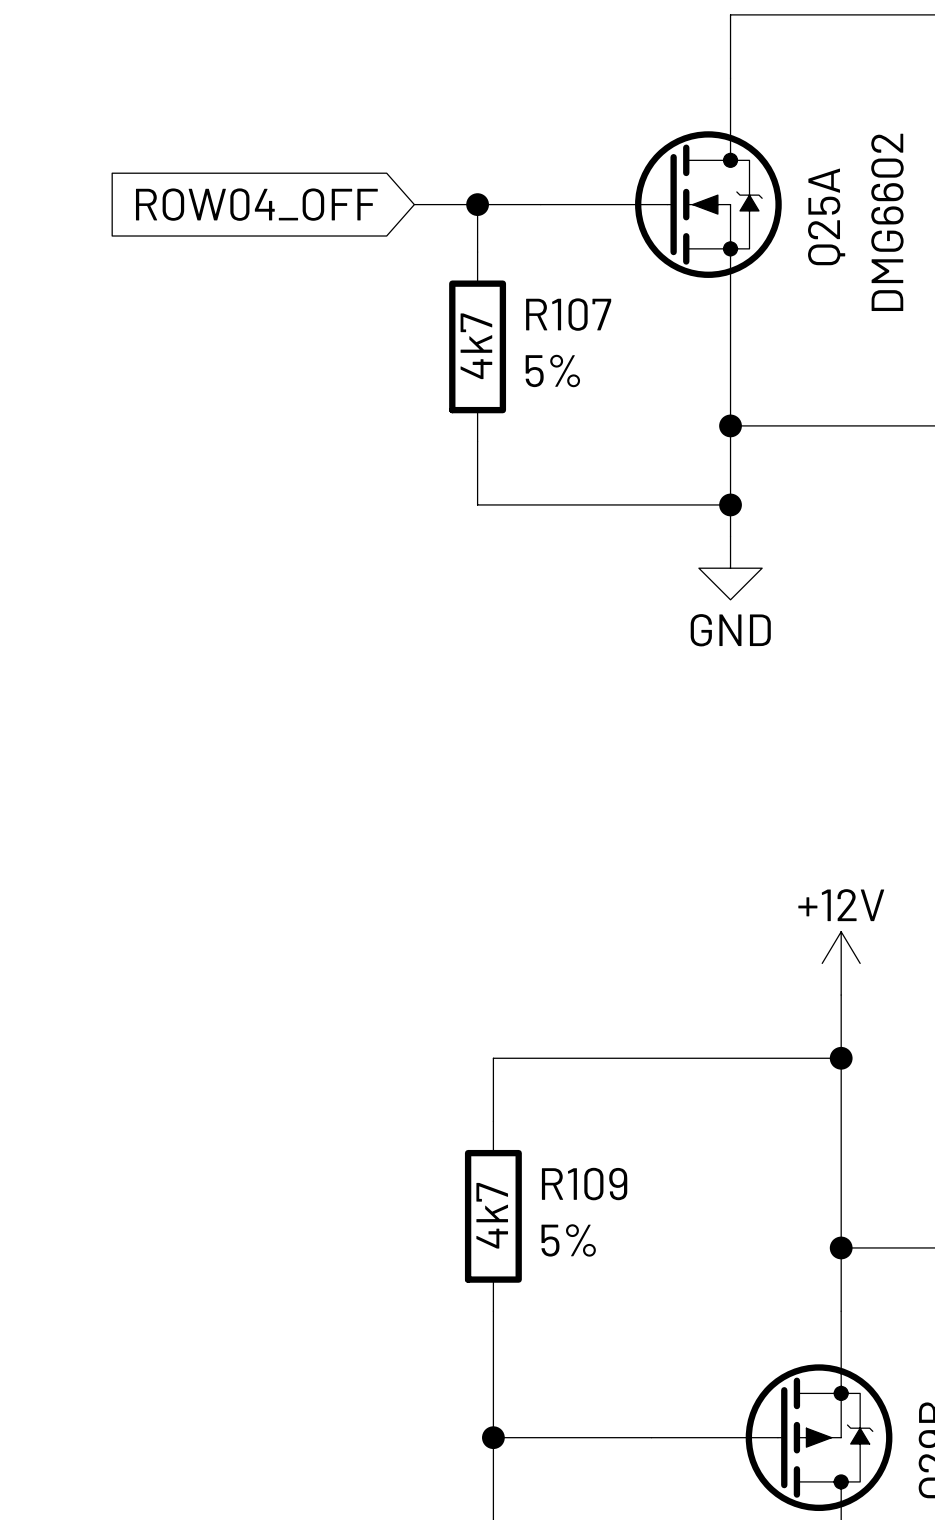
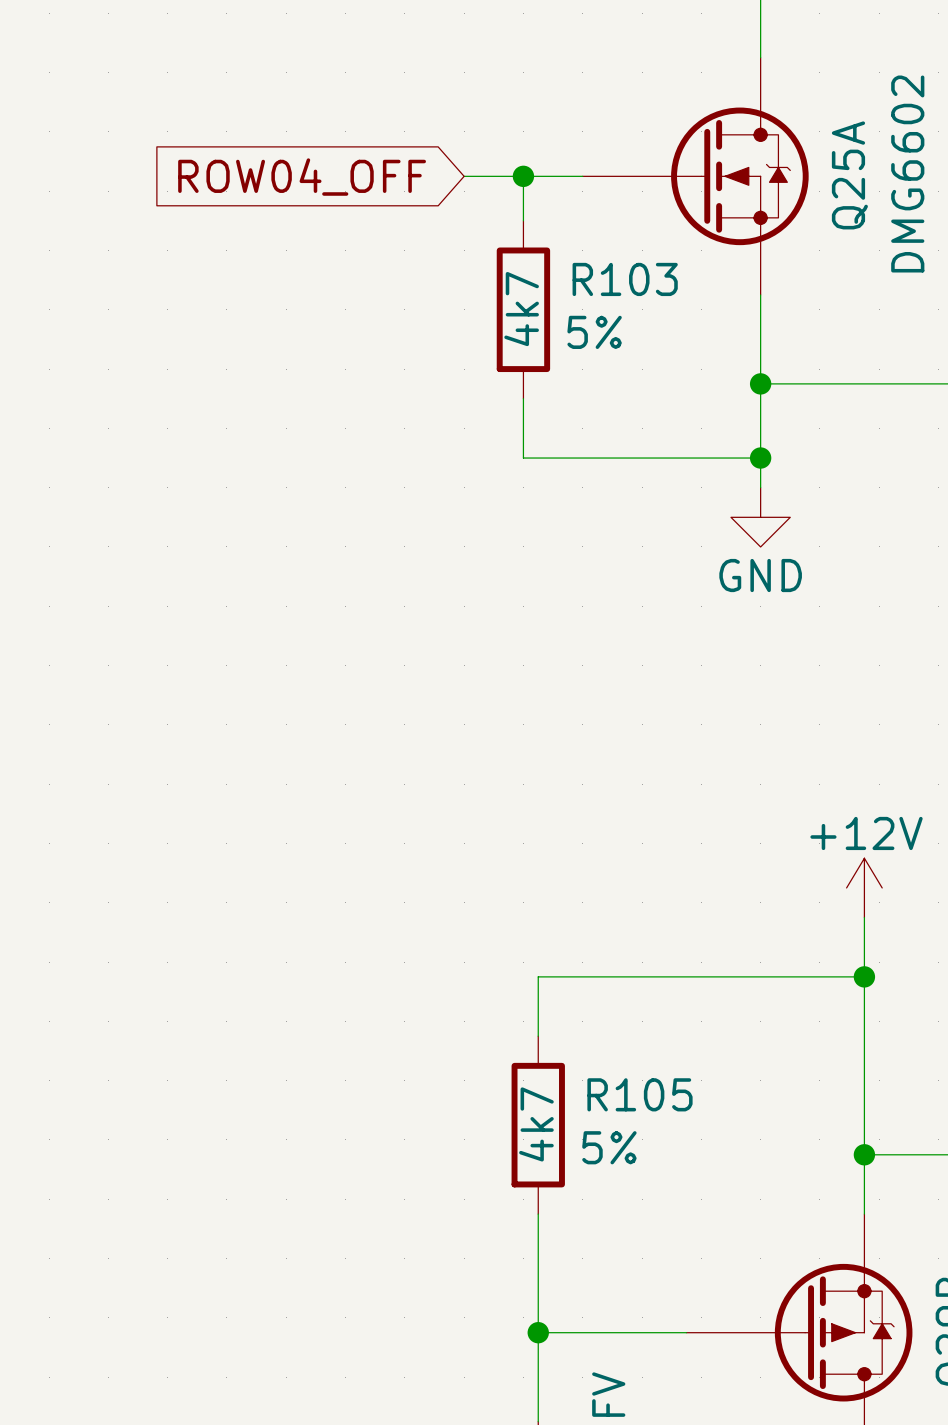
R107 name: R107 (568, 314) -> R103 (625, 279)
R109 name: R109 (584, 1184) -> R105 (639, 1094)

